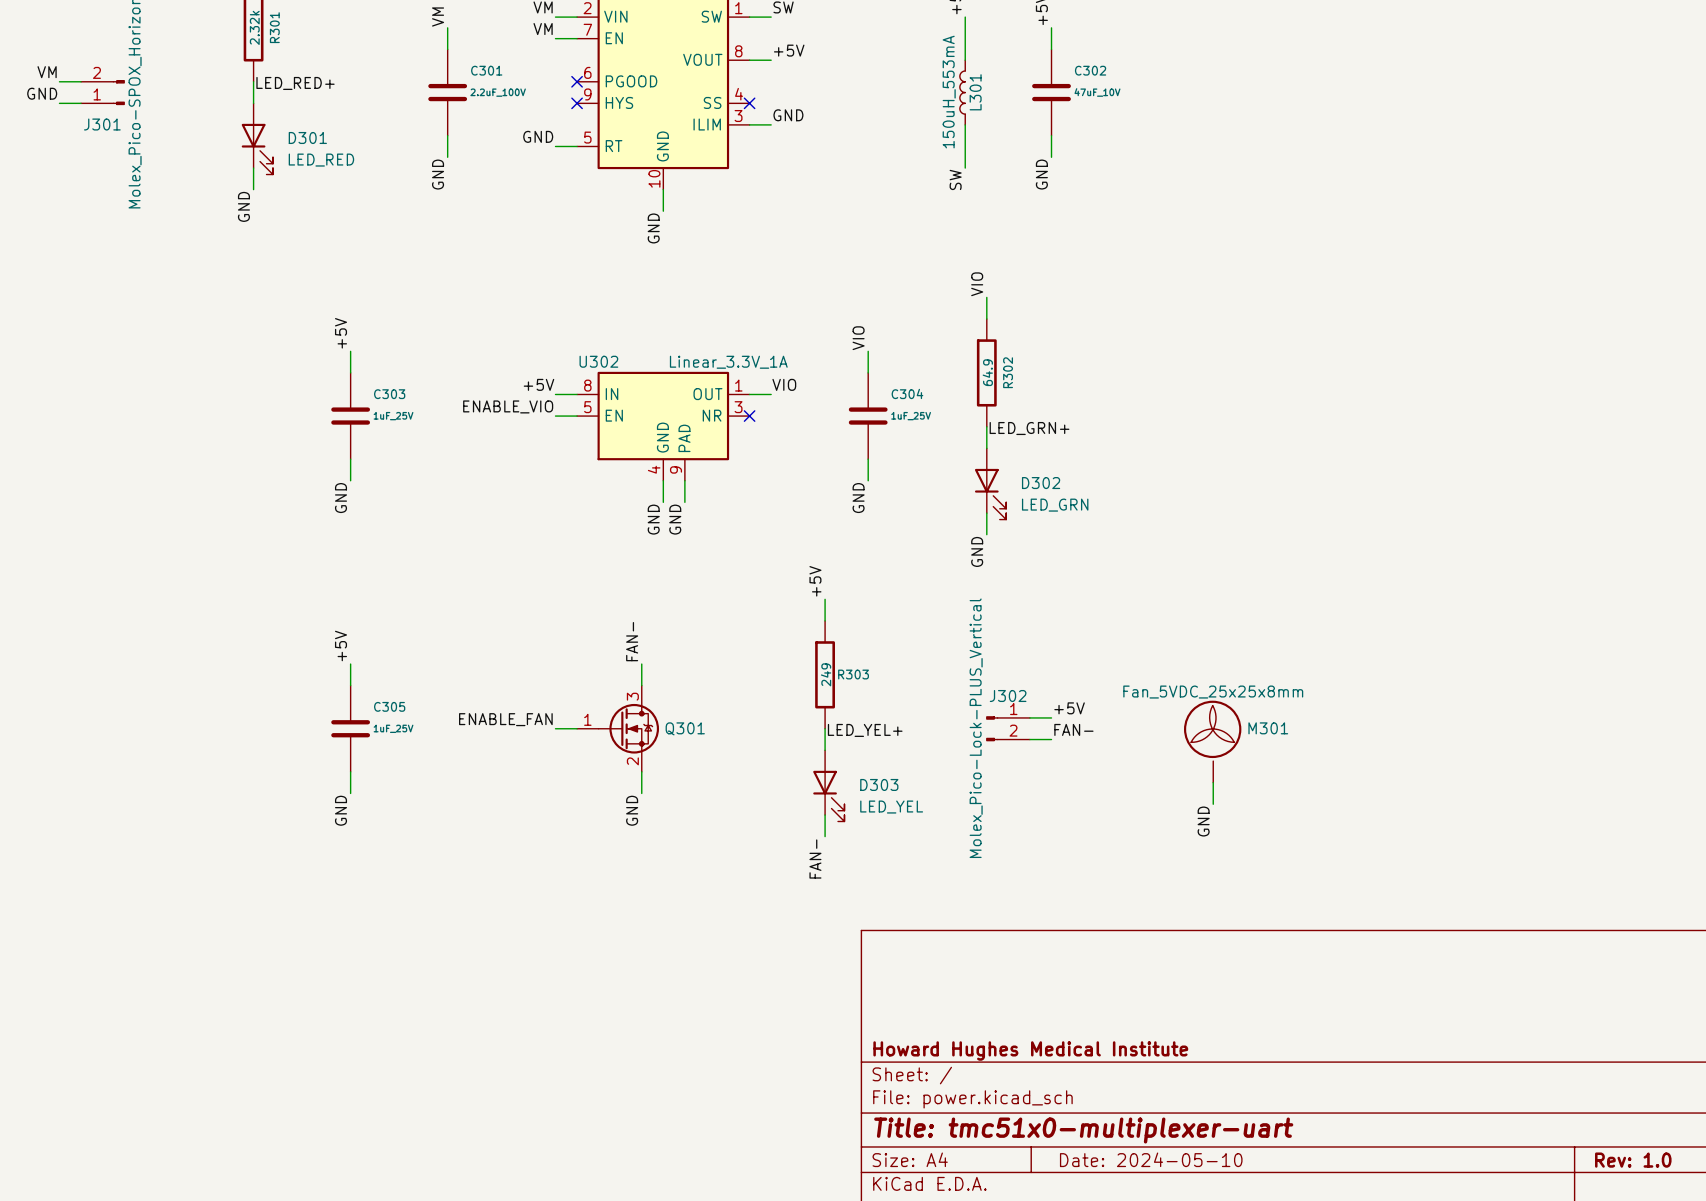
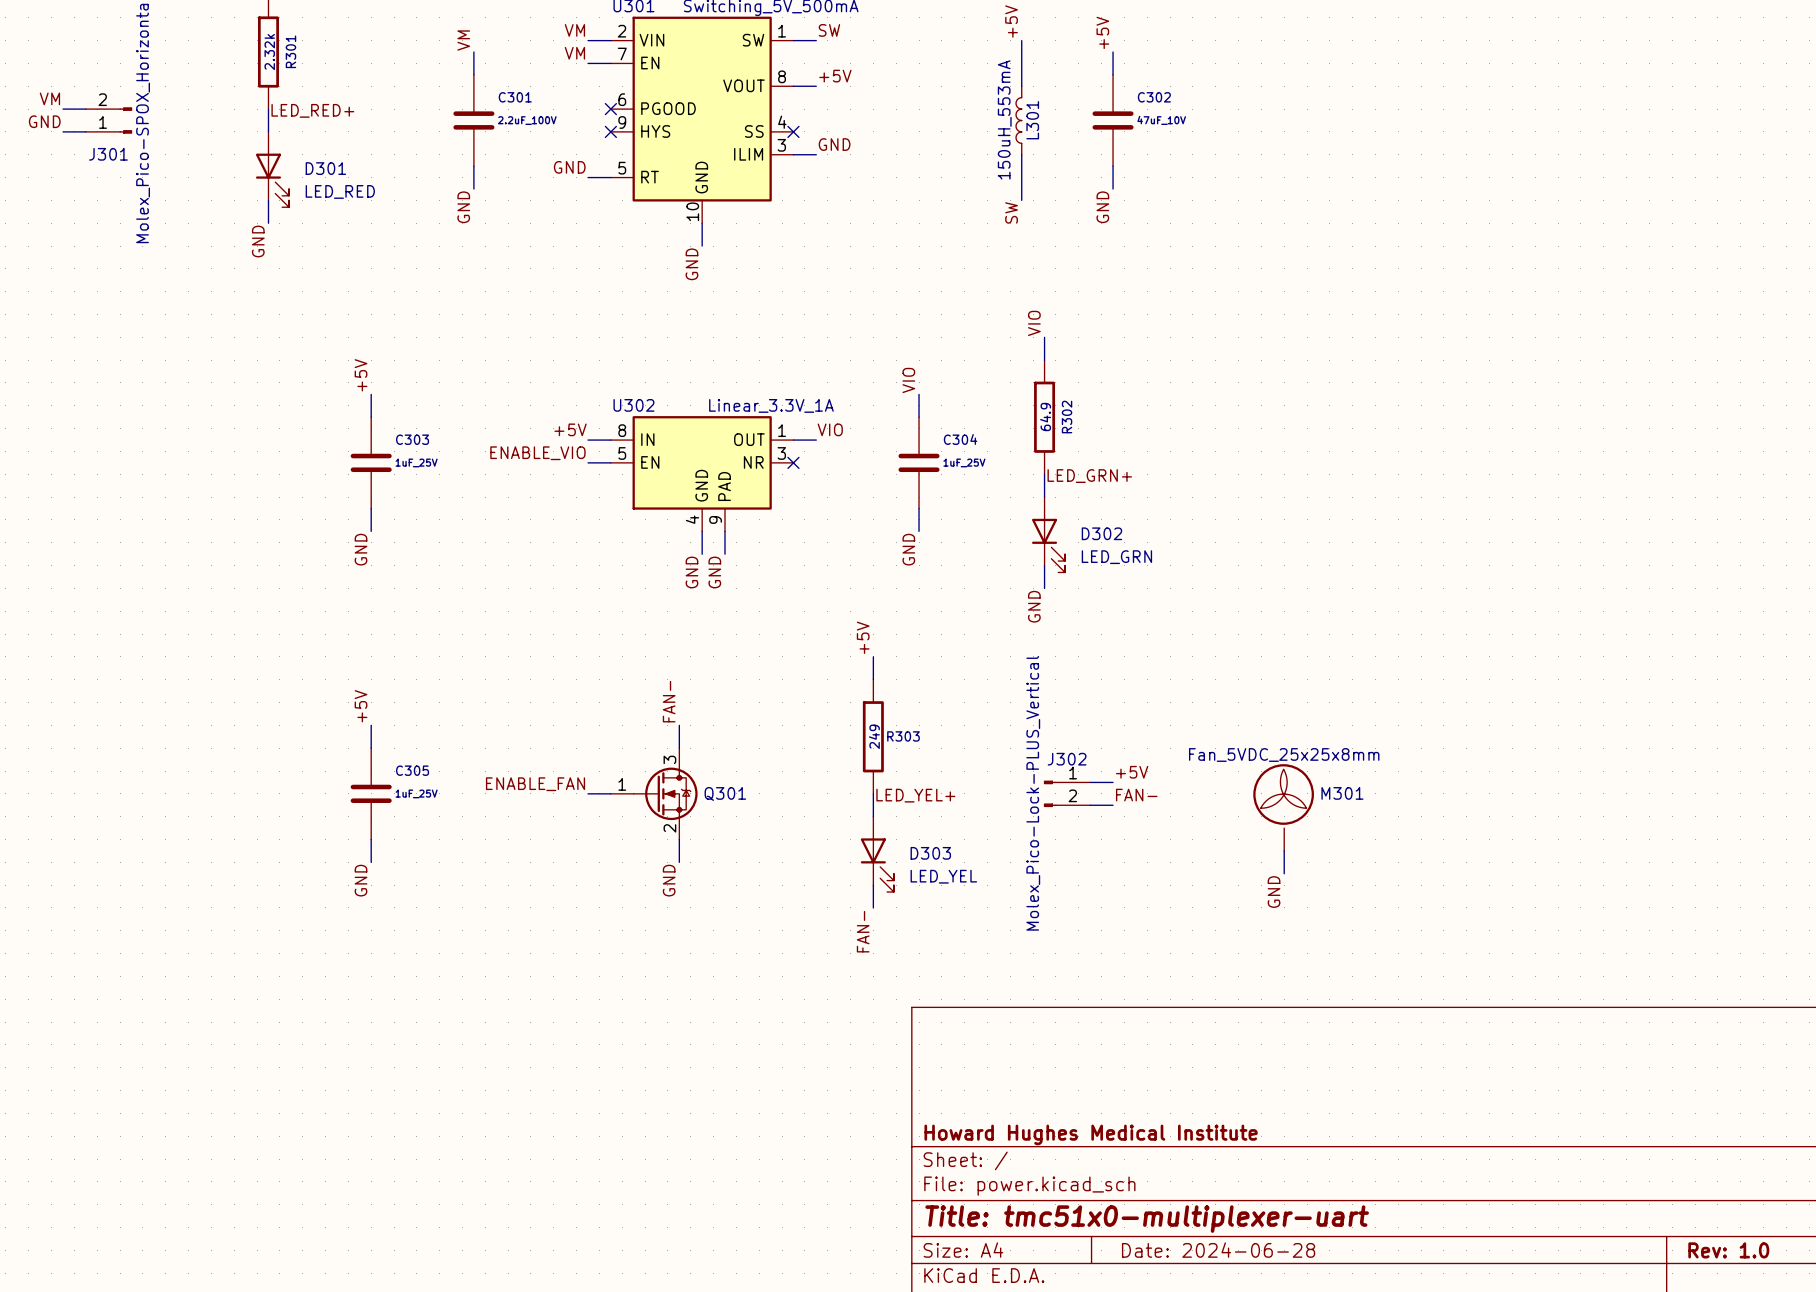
title block: Date: 2024-05-10 (1151, 1159) -> Date: 2024-06-28 (1218, 1250)

